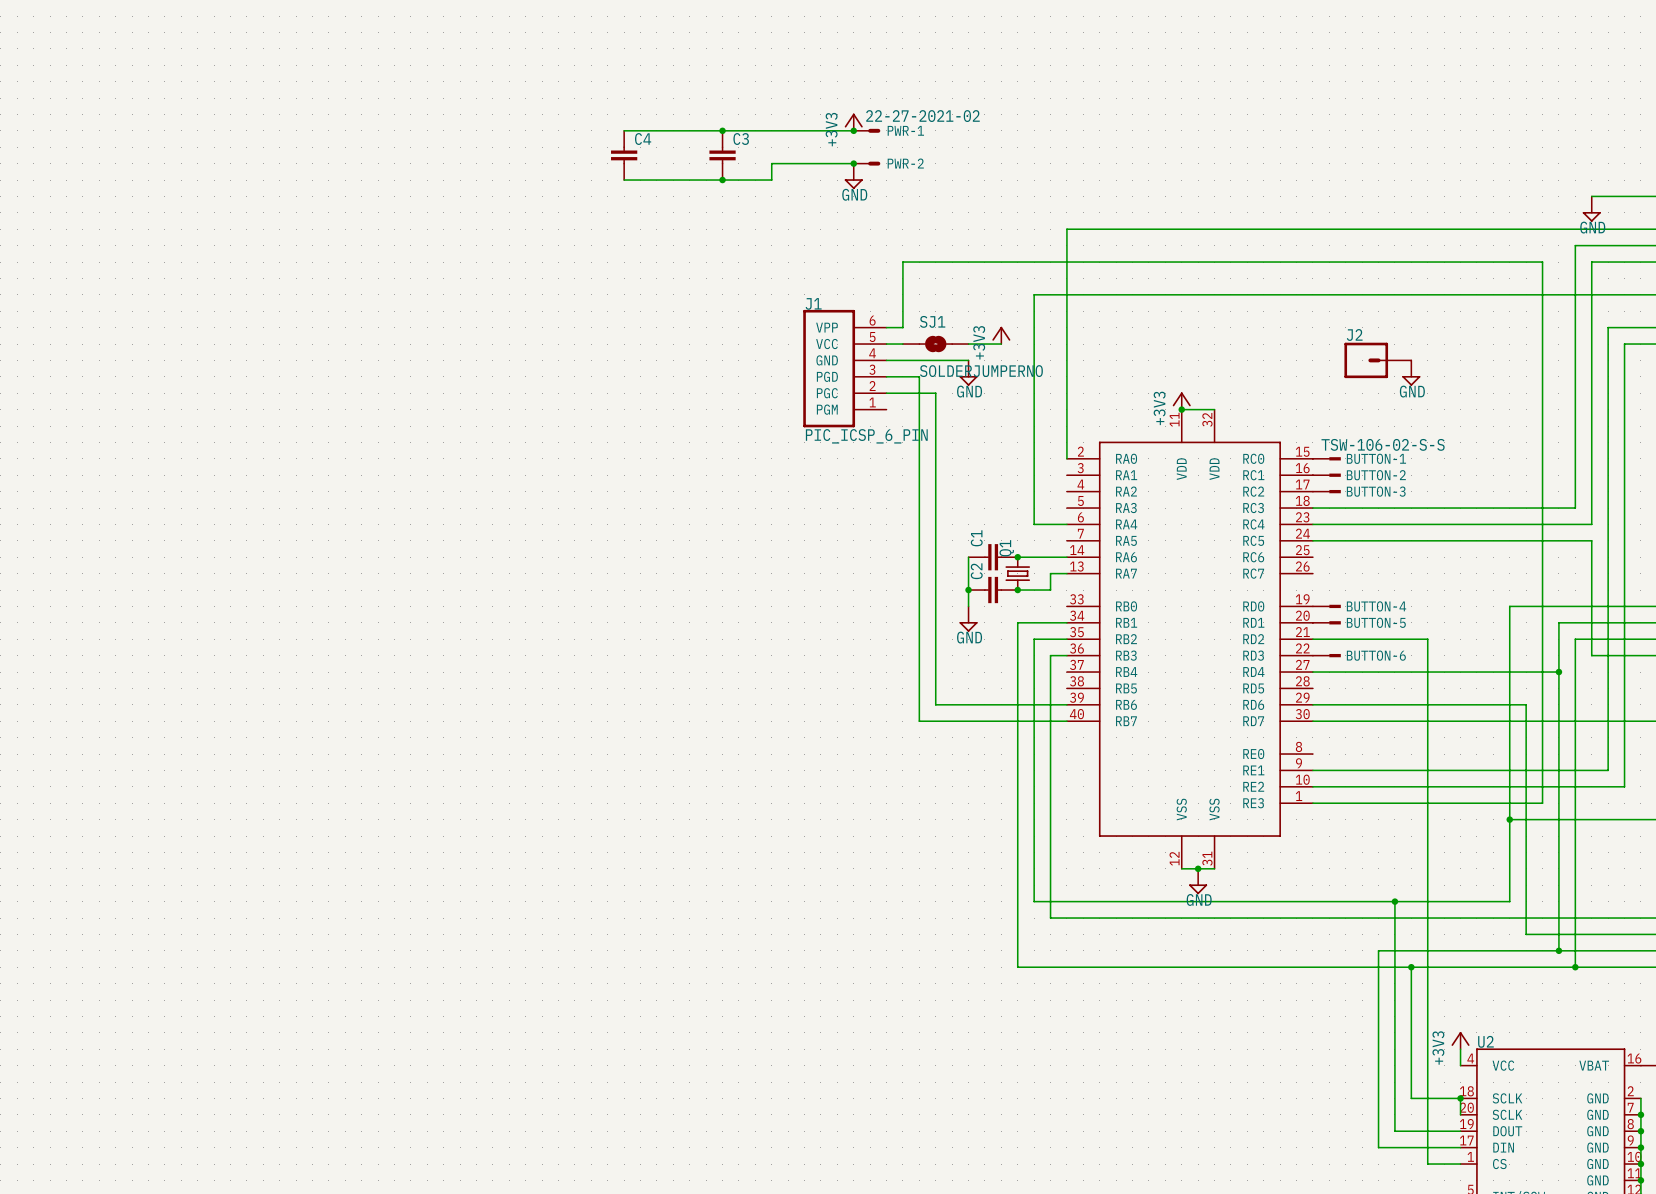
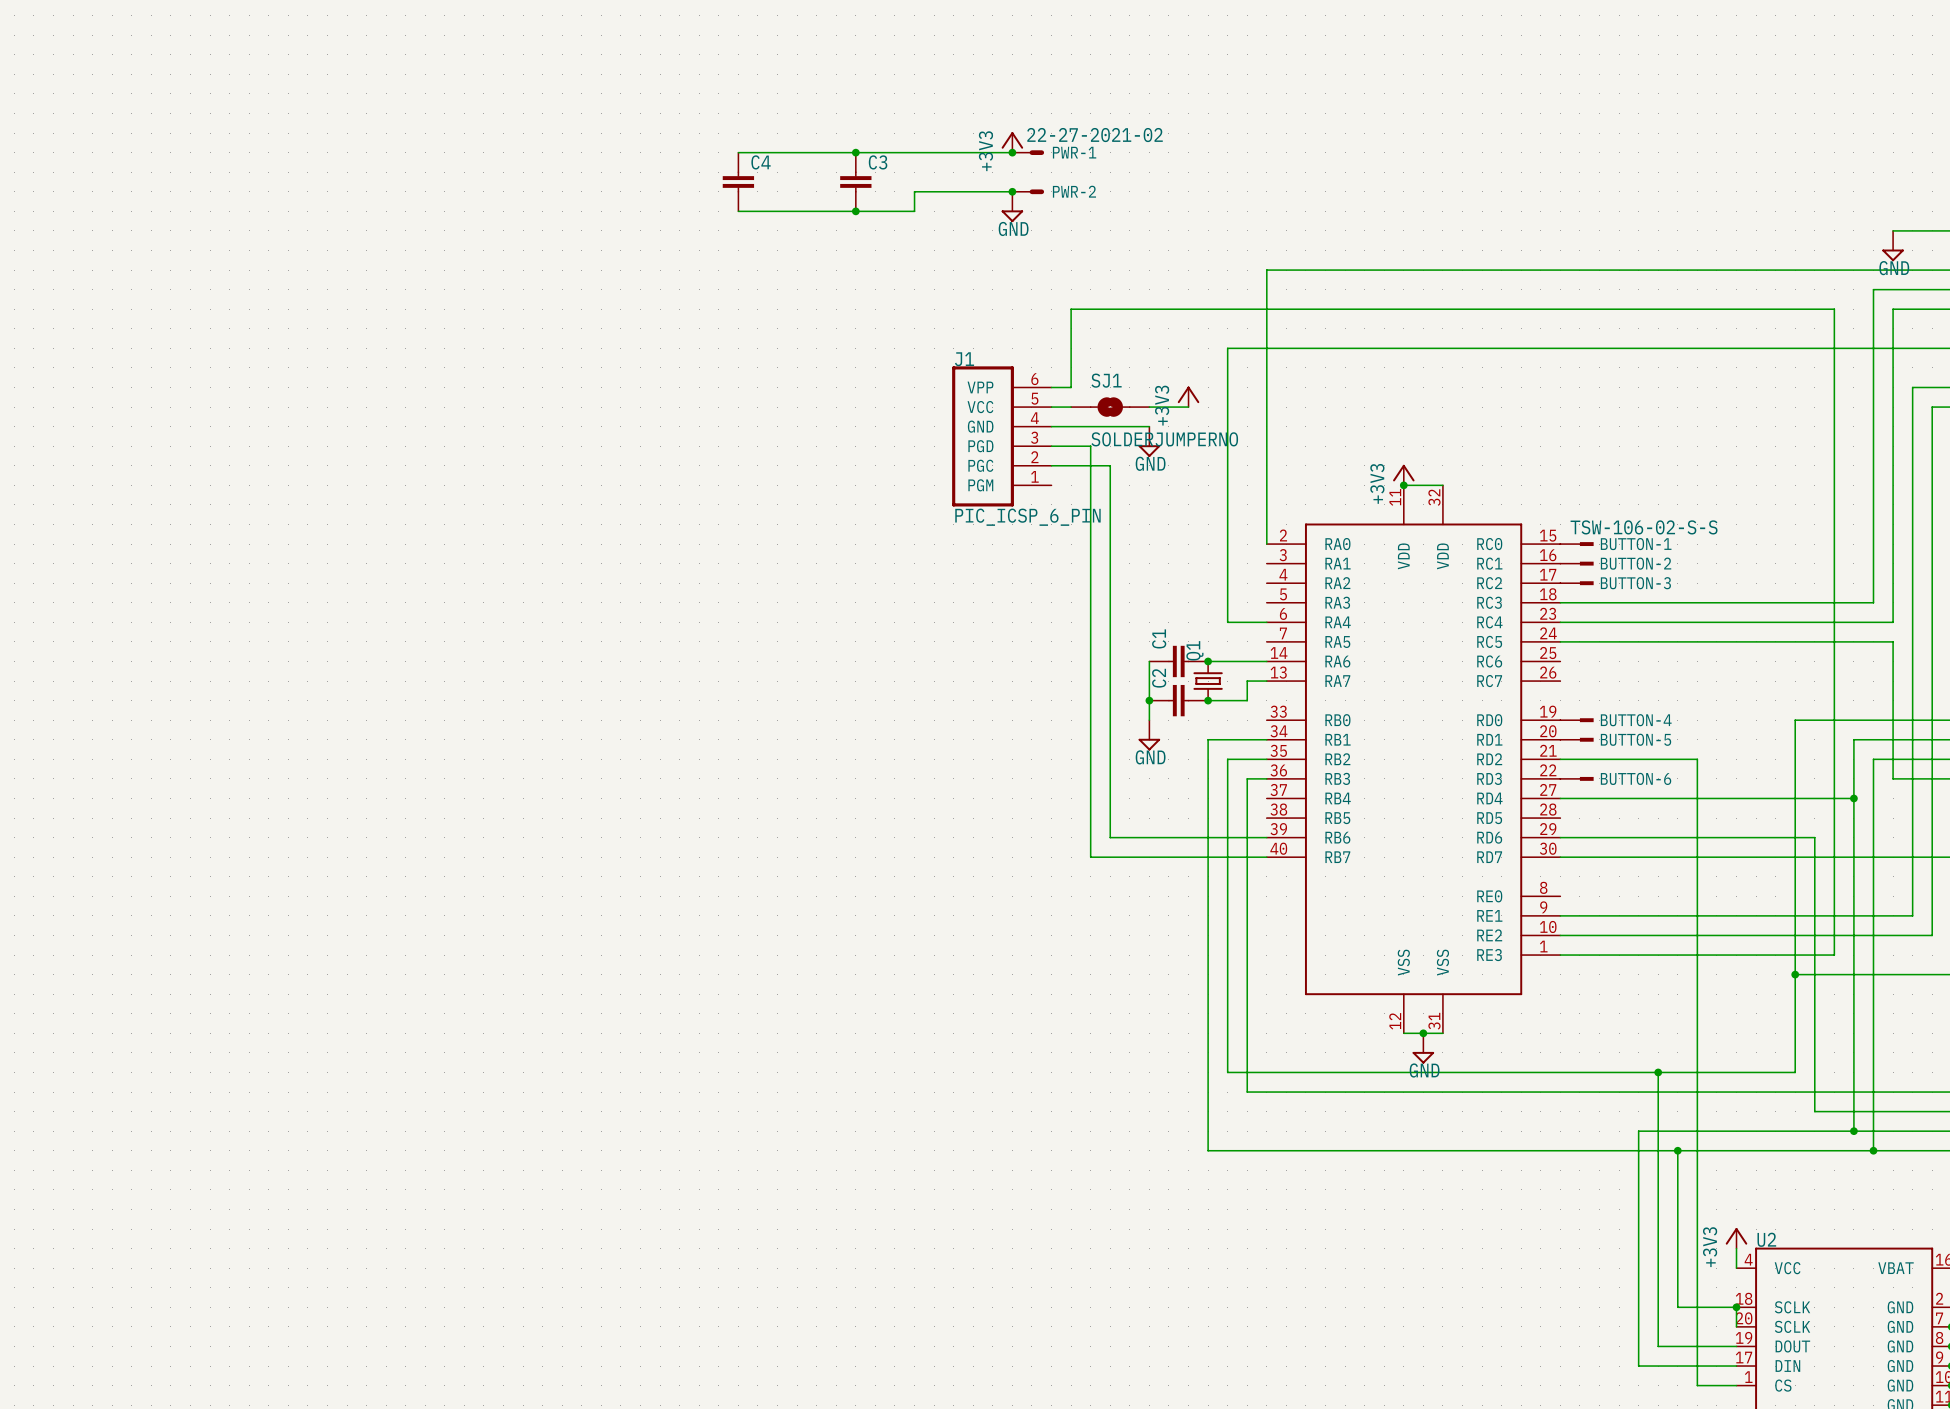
J2: (1377, 360) -> none
power symbol: GND (1411, 373) -> none

